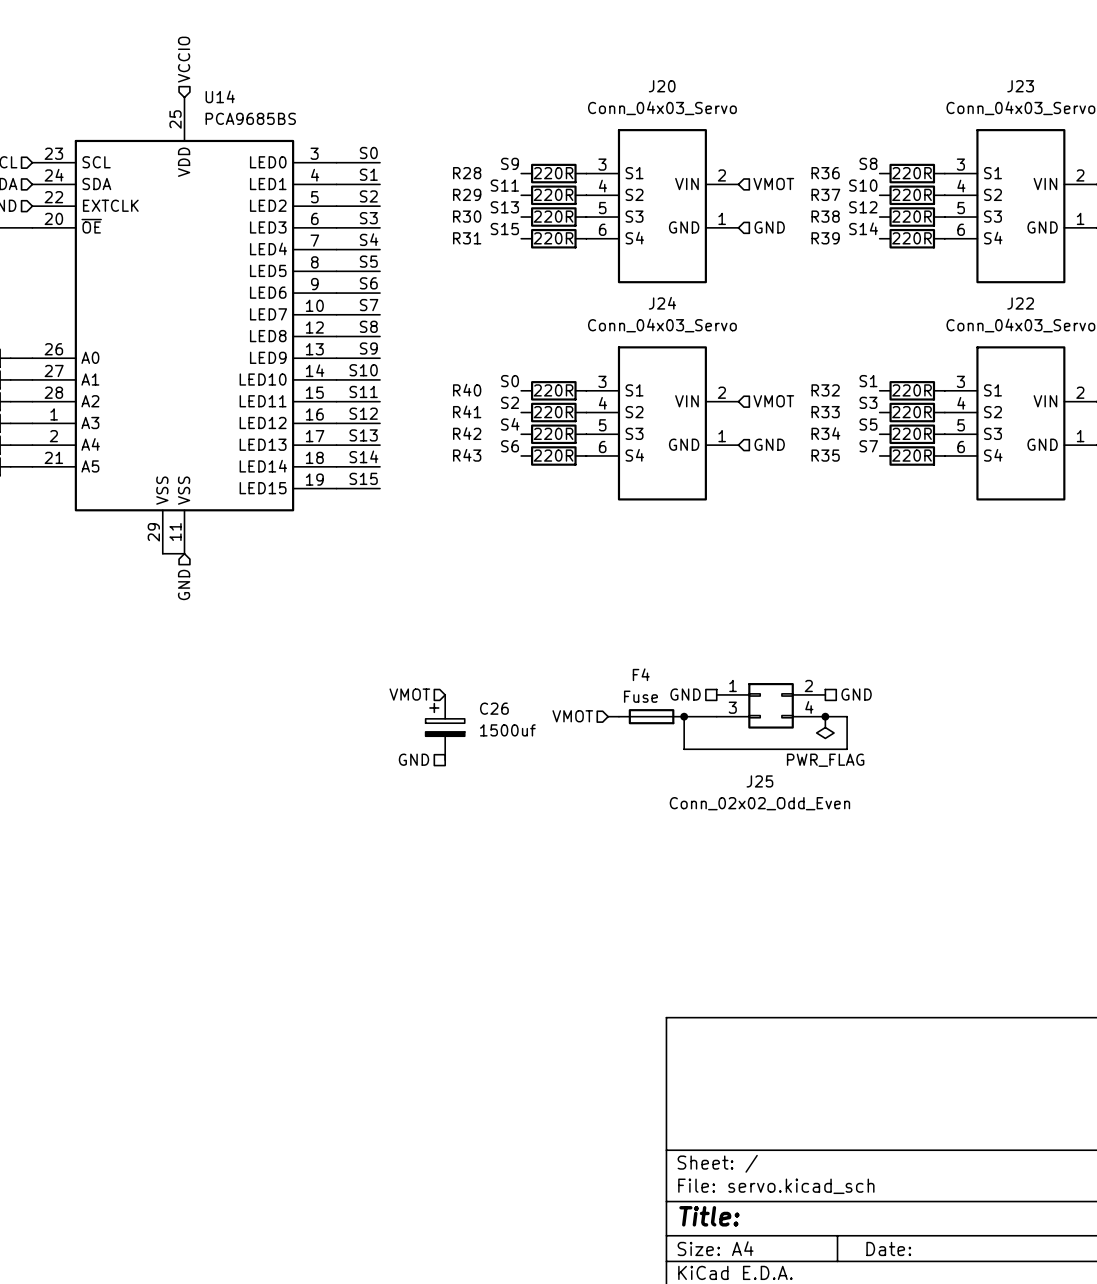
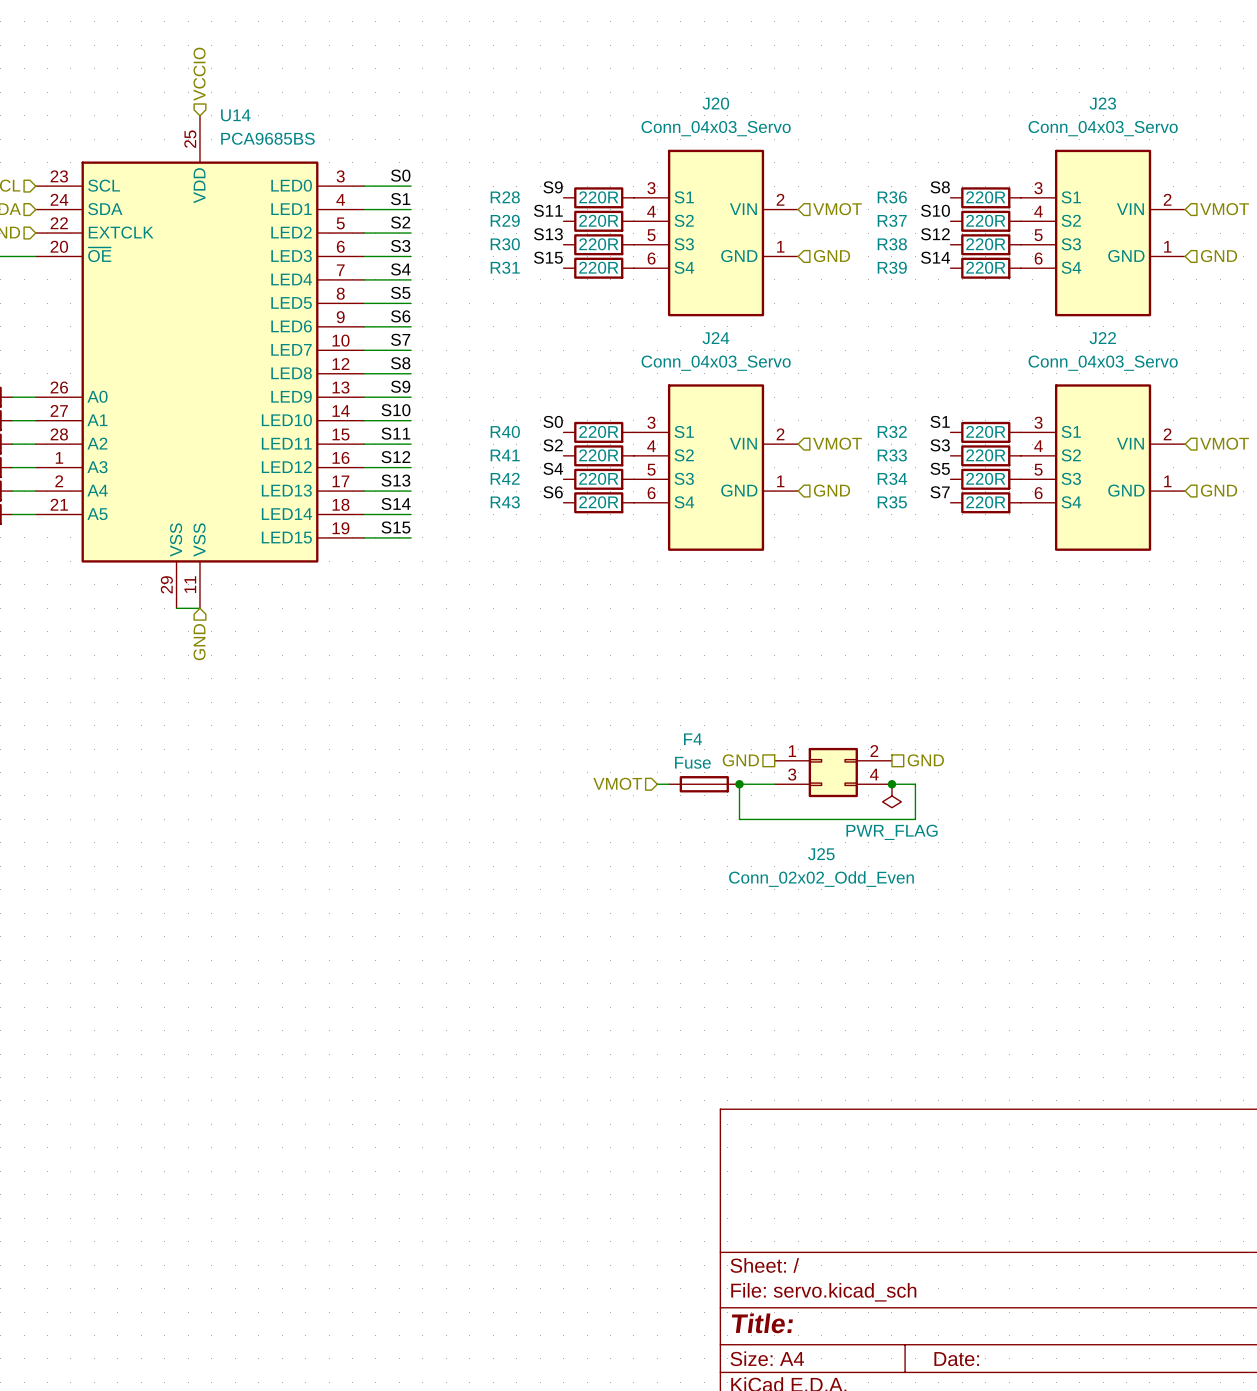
hierarchical label: VMOT (409, 694) -> none
C26: 1500uf (445, 727) -> none
hierarchical label: GND (413, 759) -> none

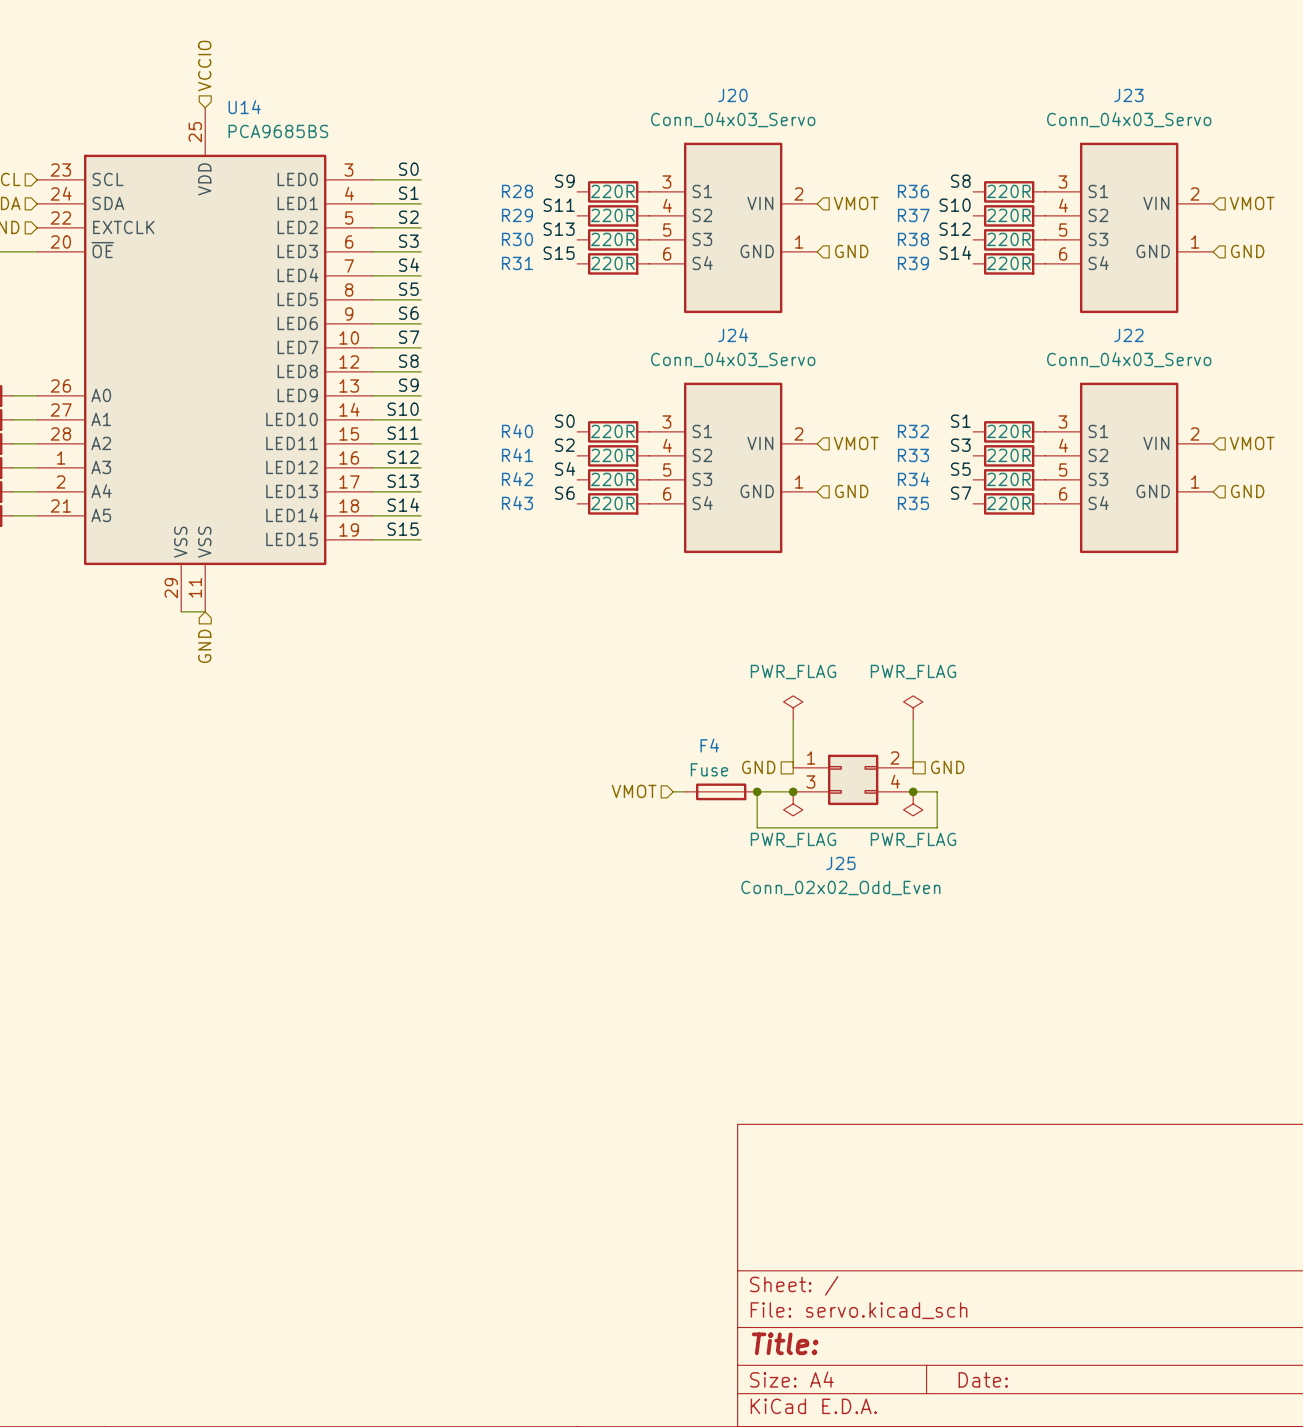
power symbol: none -> PWR_FLAG (793, 707)
power symbol: none -> PWR_FLAG (913, 707)
wire: none -> (793, 719) (793, 767)
wire: none -> (913, 719) (913, 767)
junction: none -> (793, 791)
power symbol: none -> PWR_FLAG (793, 803)

